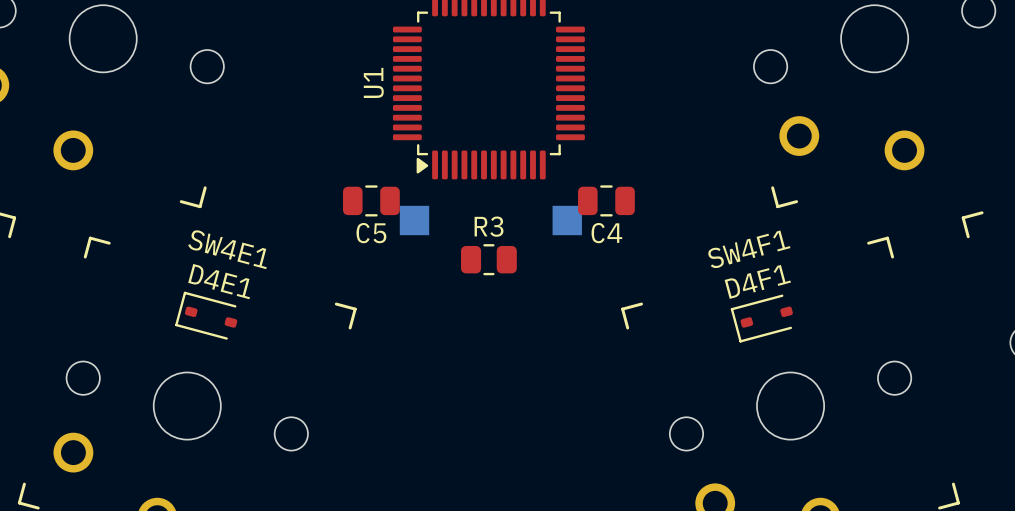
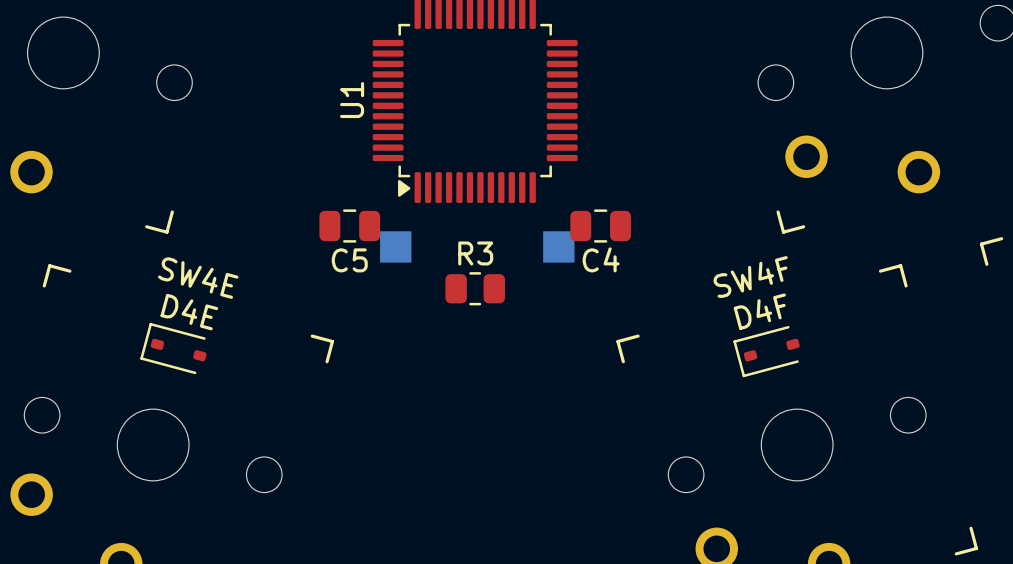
SW4E1 name: SW4E1 (227, 249) -> SW4E (198, 278)
SW4F1 name: SW4F1 (749, 249) -> SW4F (750, 277)
D4E1 name: D4E1 (219, 281) -> D4E (189, 312)
D4F1 name: D4F1 (757, 281) -> D4F (759, 311)

